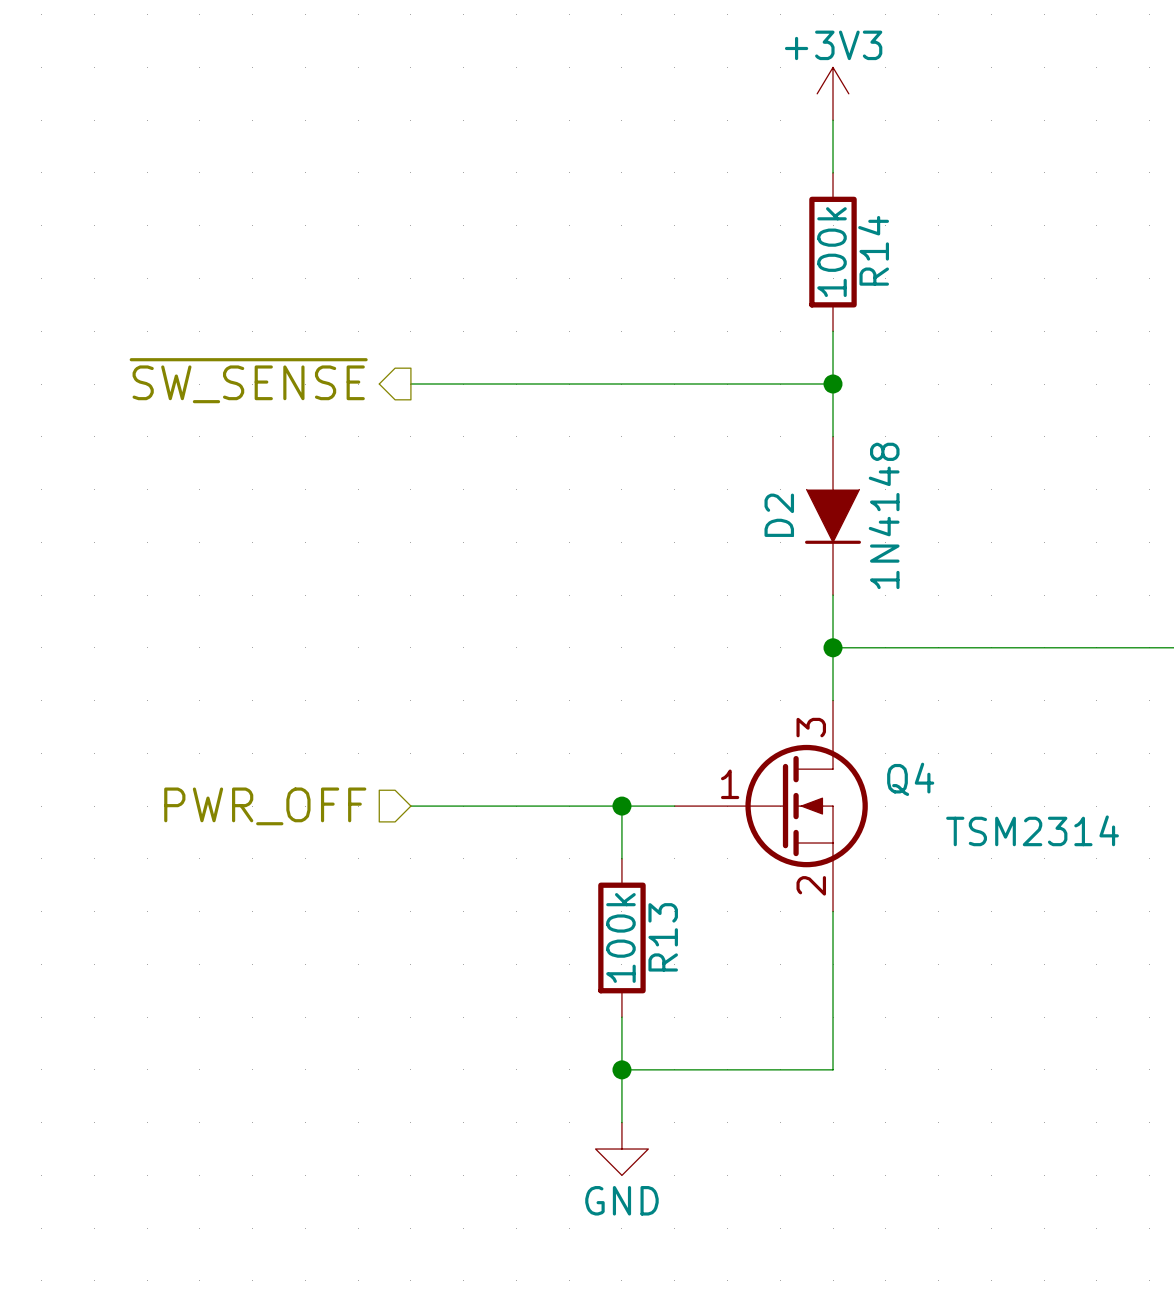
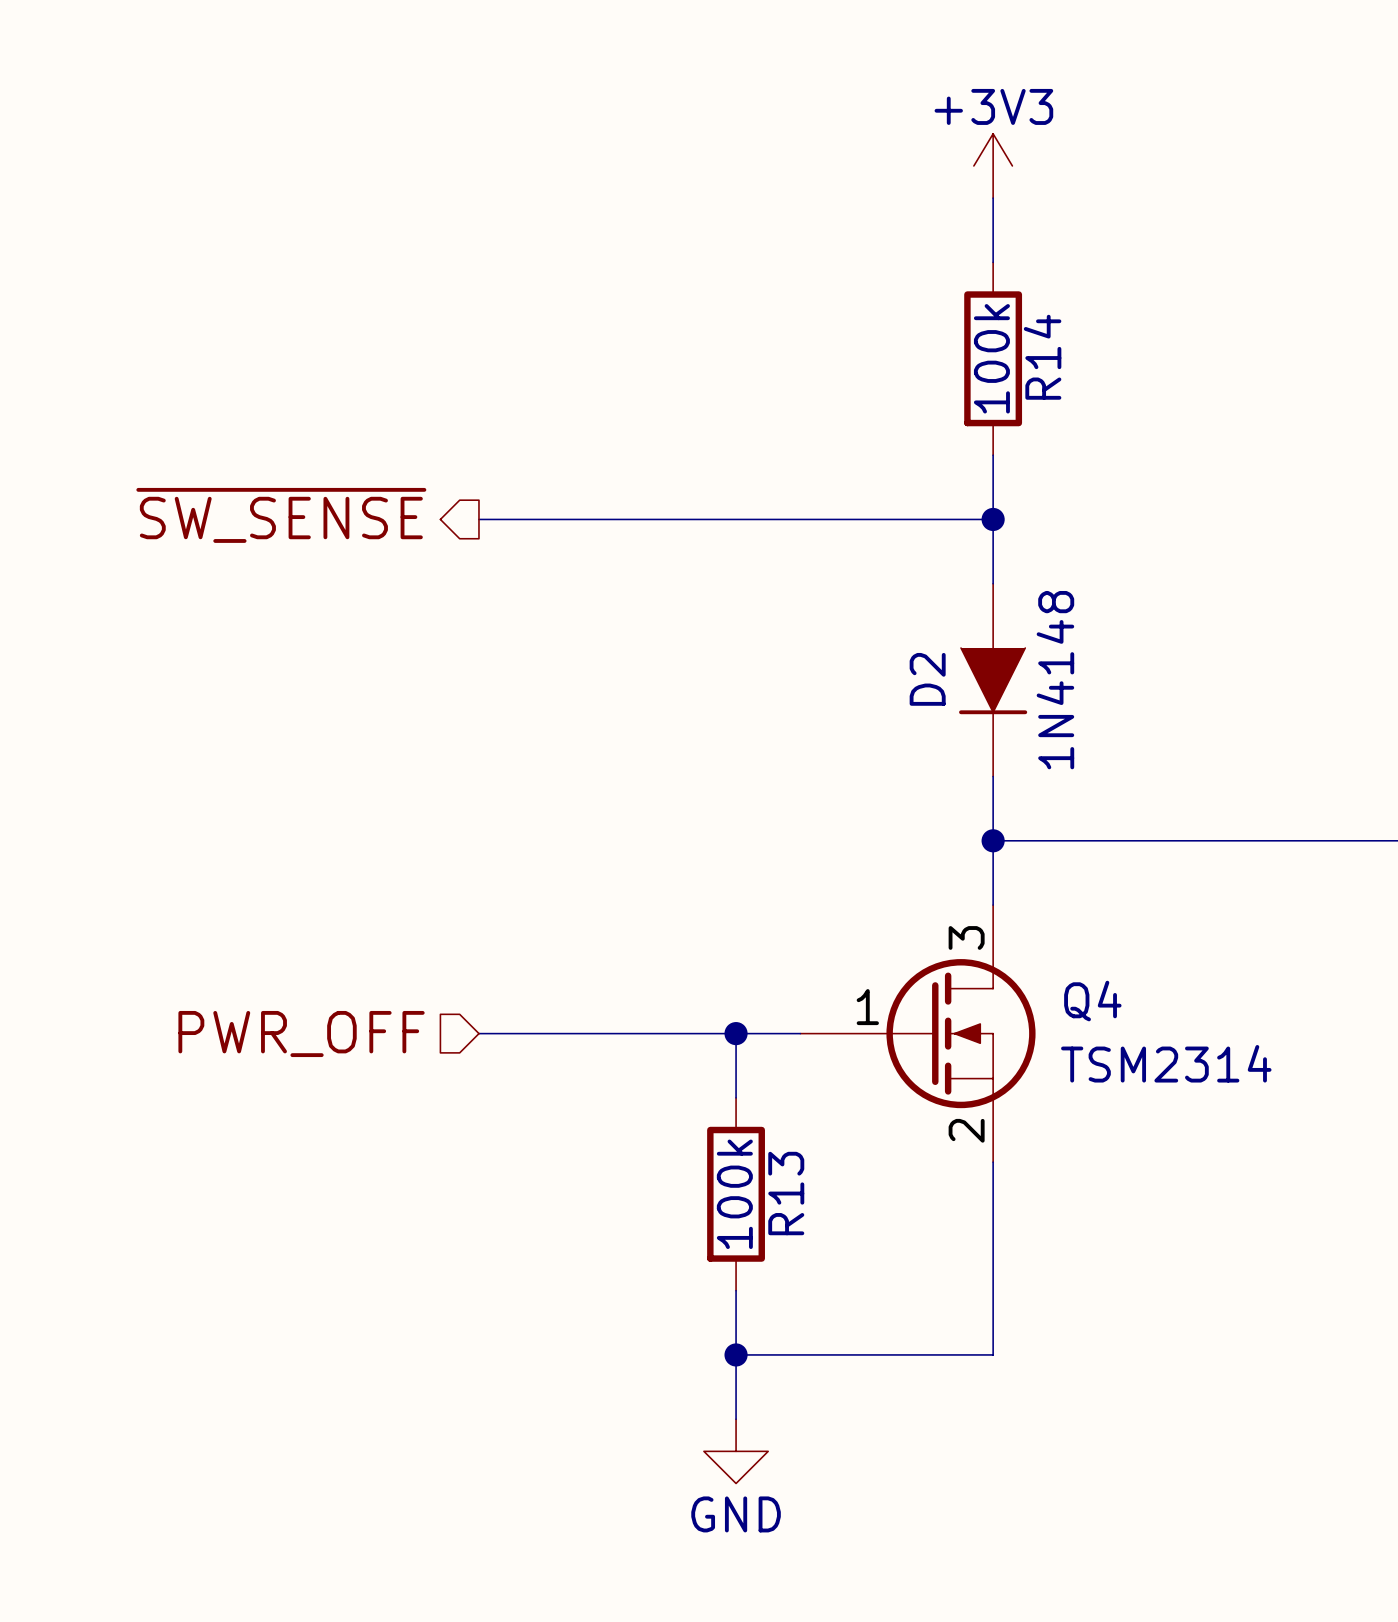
Q4 name position: Q4 (910, 779) -> Q4 (1092, 1001)
Q4 value position: TSM2314 (1032, 830) -> TSM2314 (1166, 1063)

